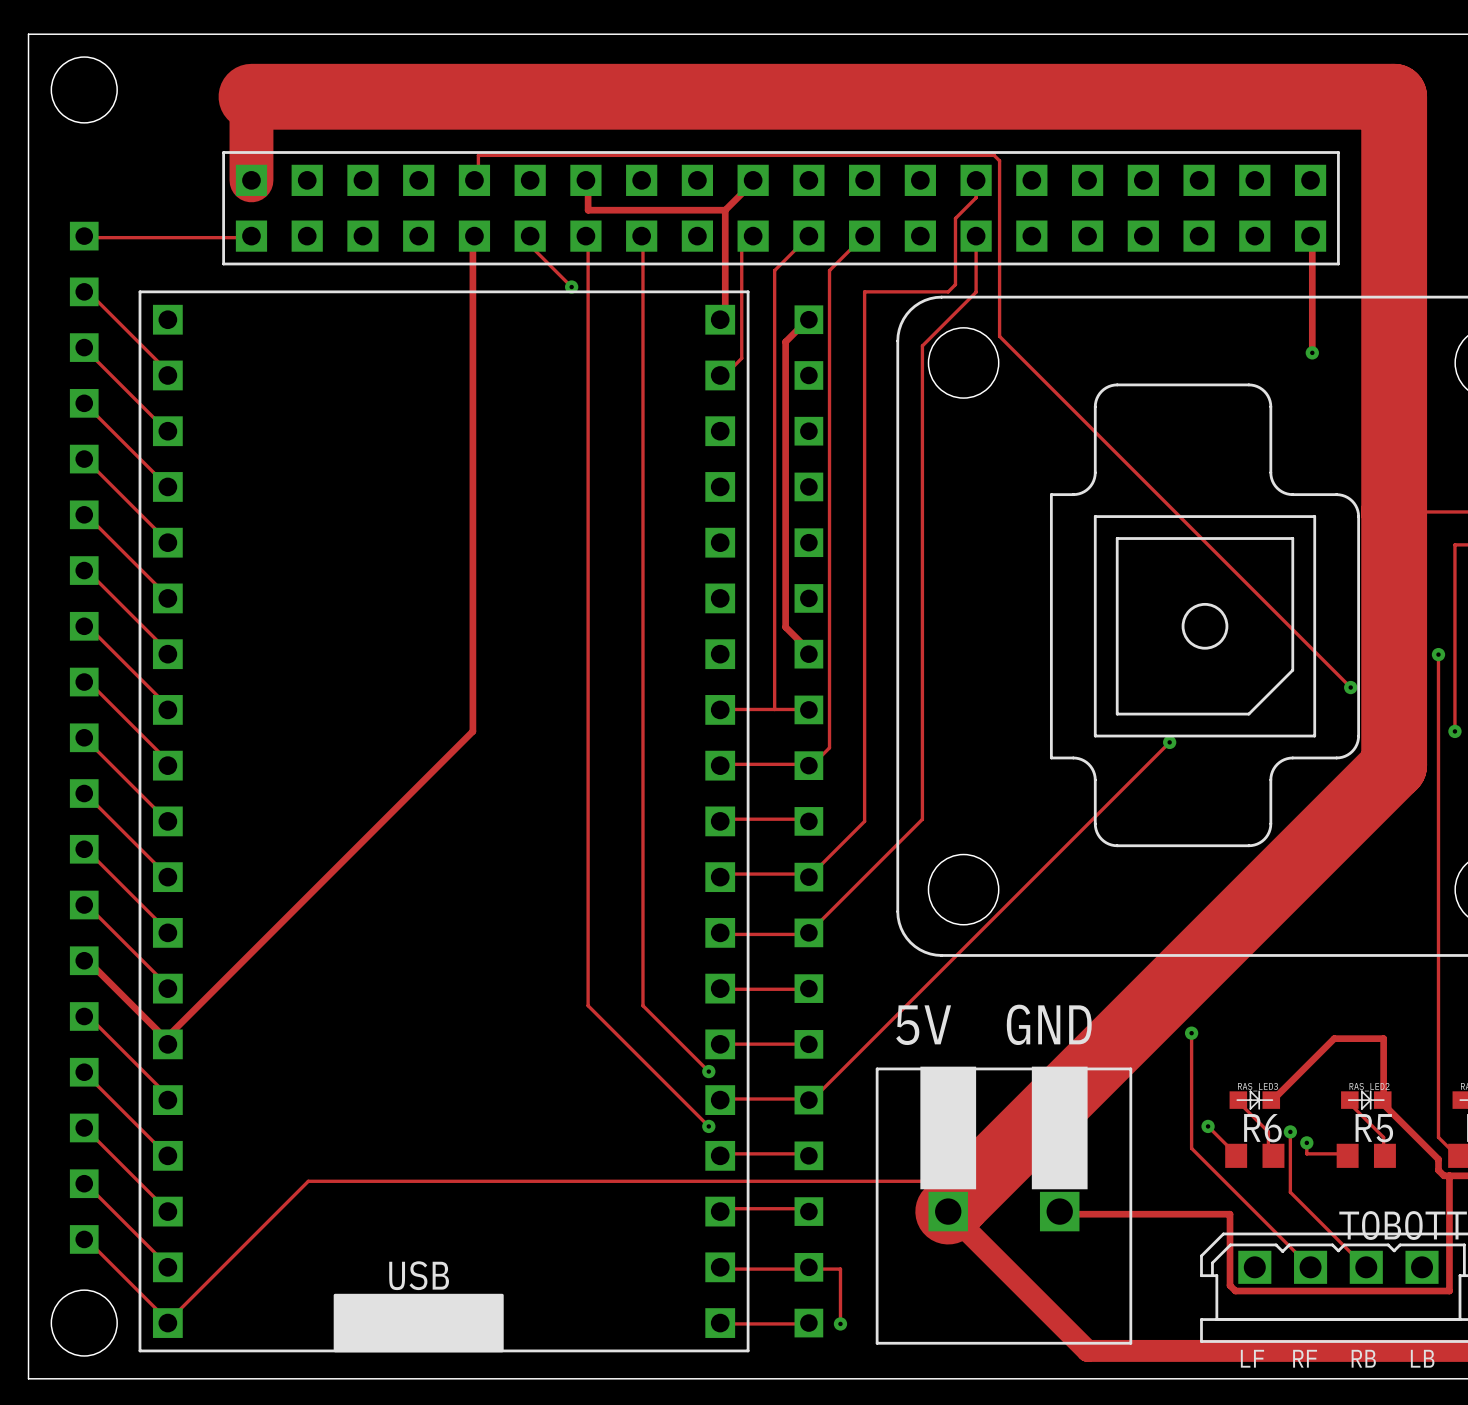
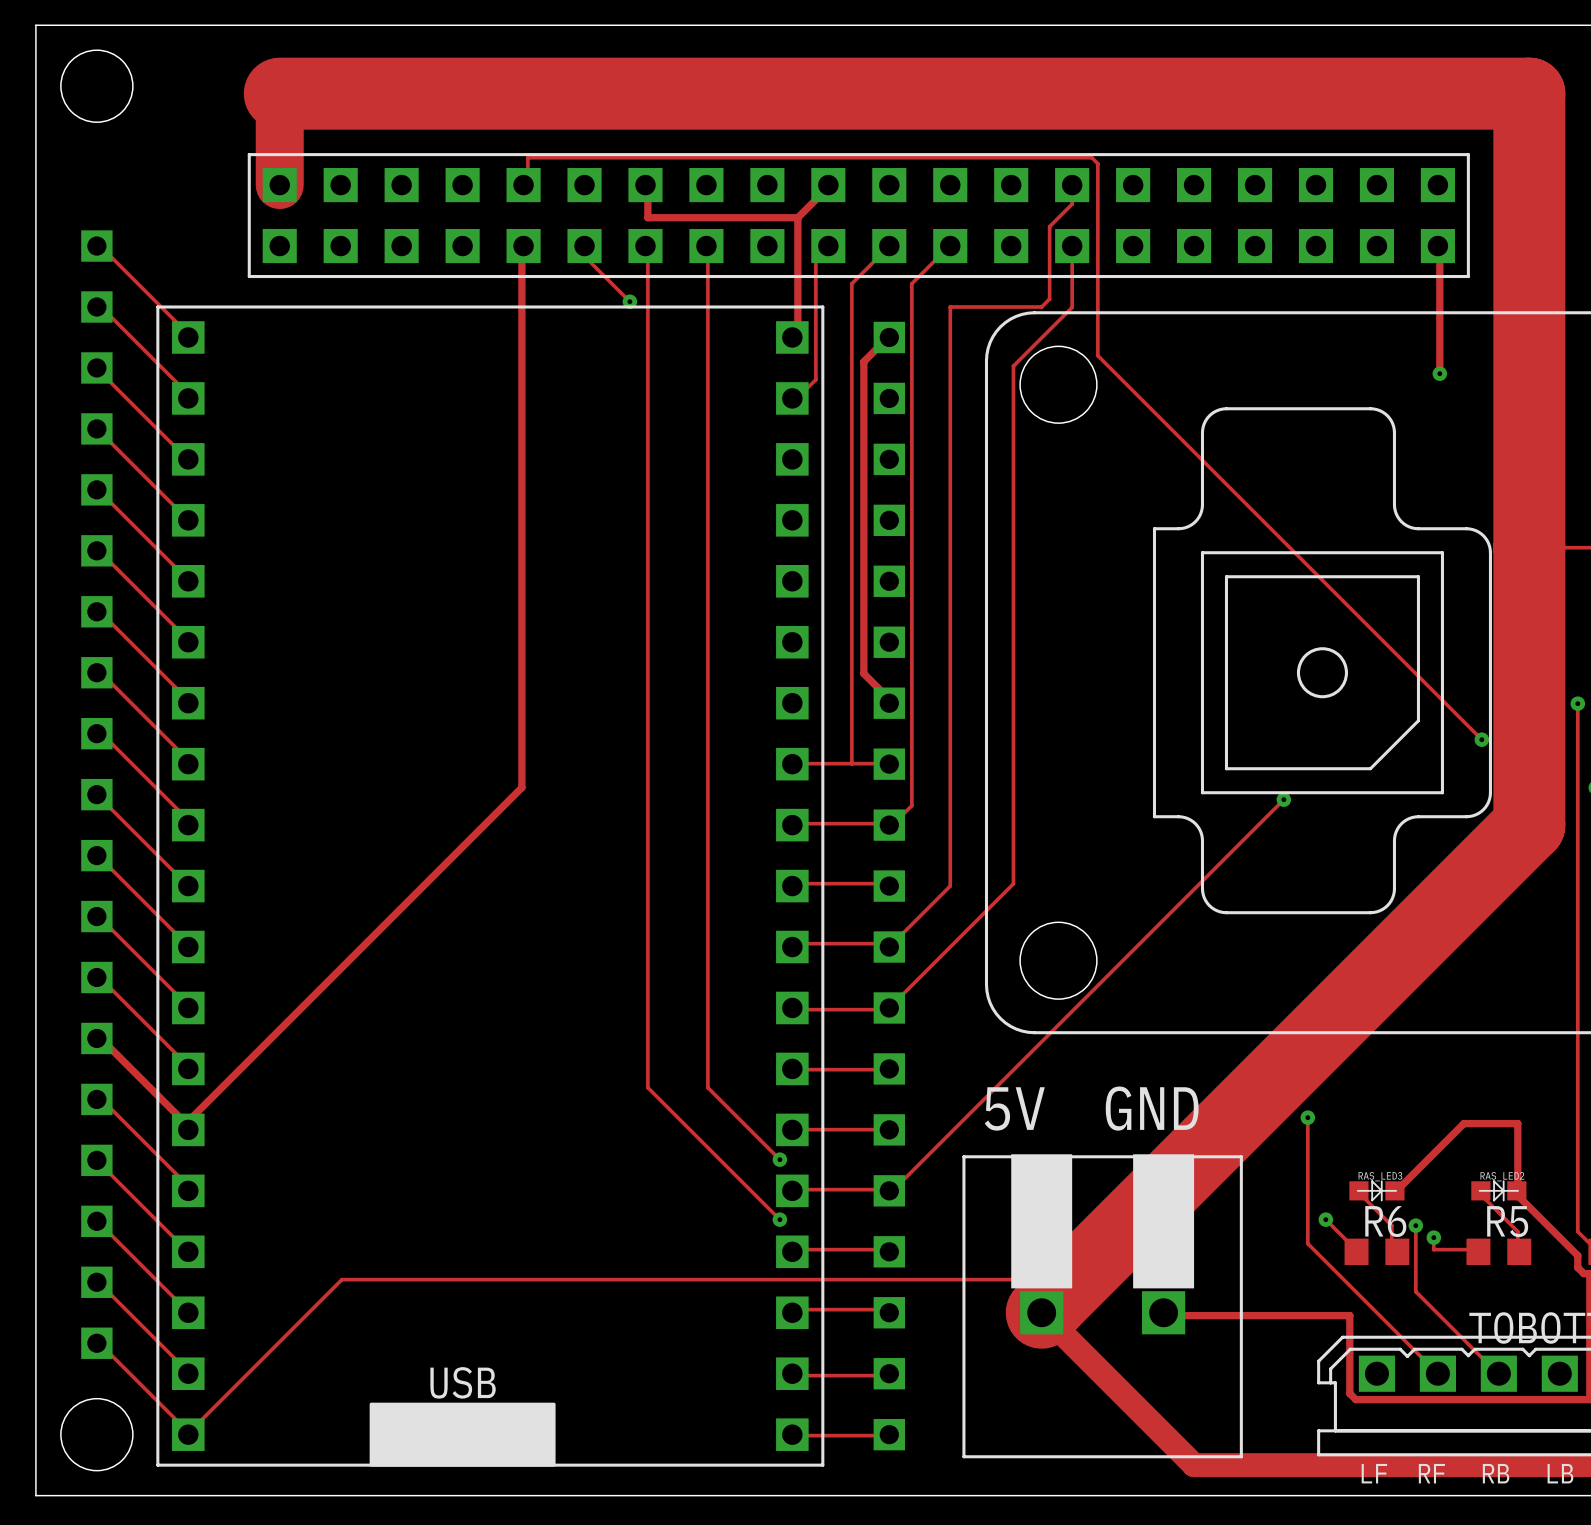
track: (84, 236) (94, 237) (247, 237) (251, 236) -> (96, 246) (101, 247) (185, 331)
track: (808, 1267) (840, 1269) (840, 1323) -> none
via: (840, 1323) -> none

